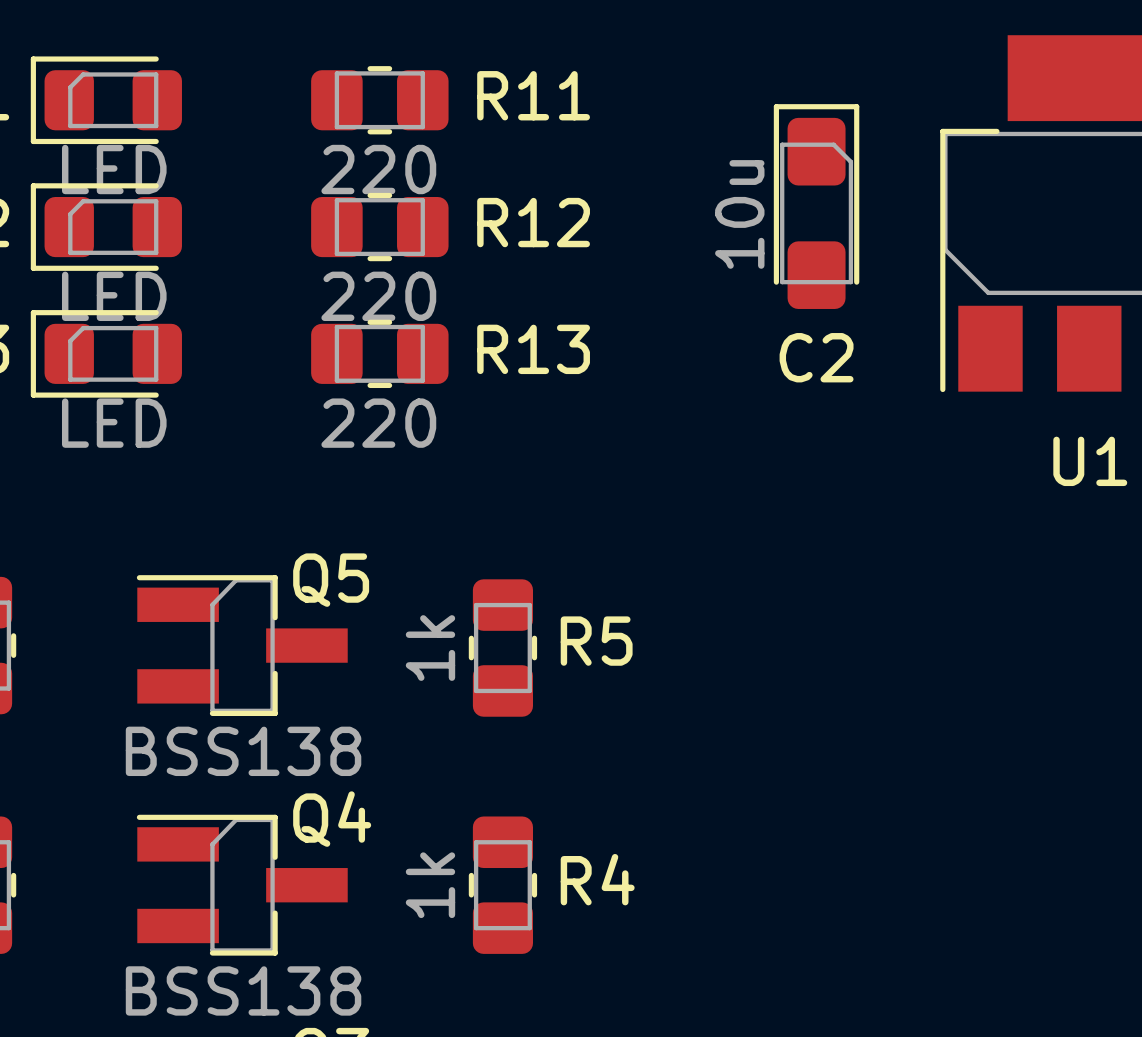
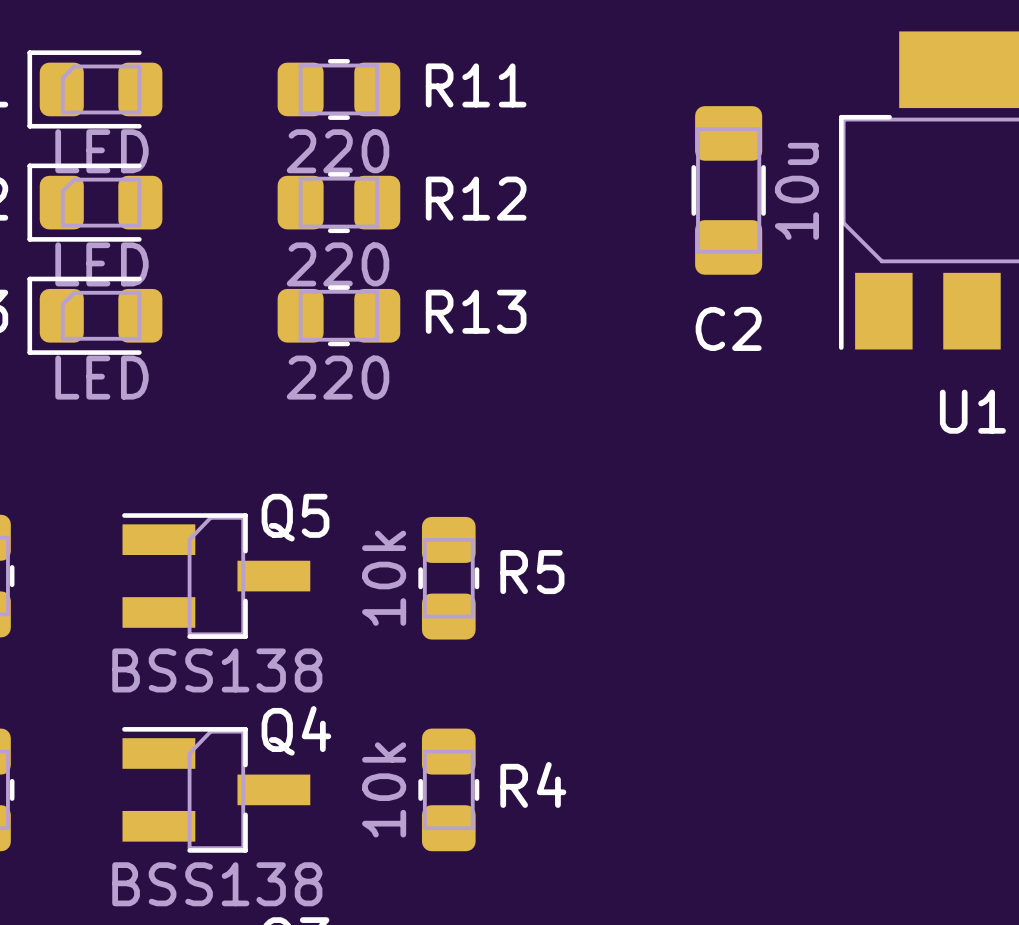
C2 footprint: [773, 104, 860, 309] -> [691, 106, 766, 275]
C2 value position: 10u (739, 214) -> 10u (796, 191)
R5 value: 1k (430, 648) -> 10k (384, 578)
R4 value: 1k (430, 885) -> 10k (384, 789)

